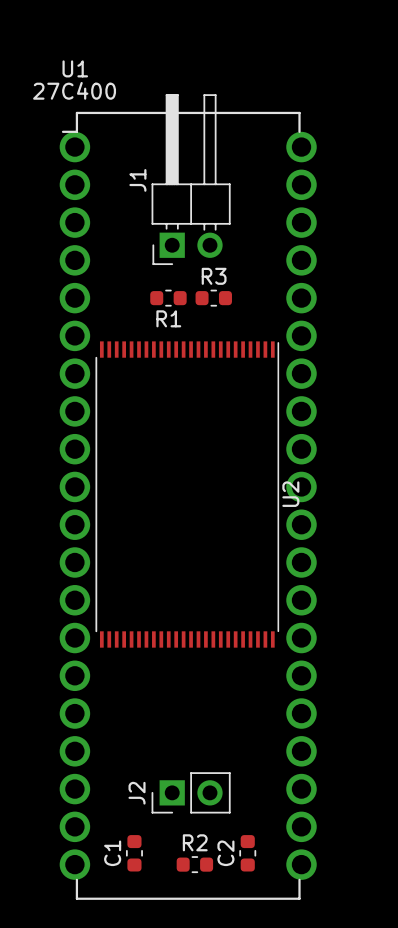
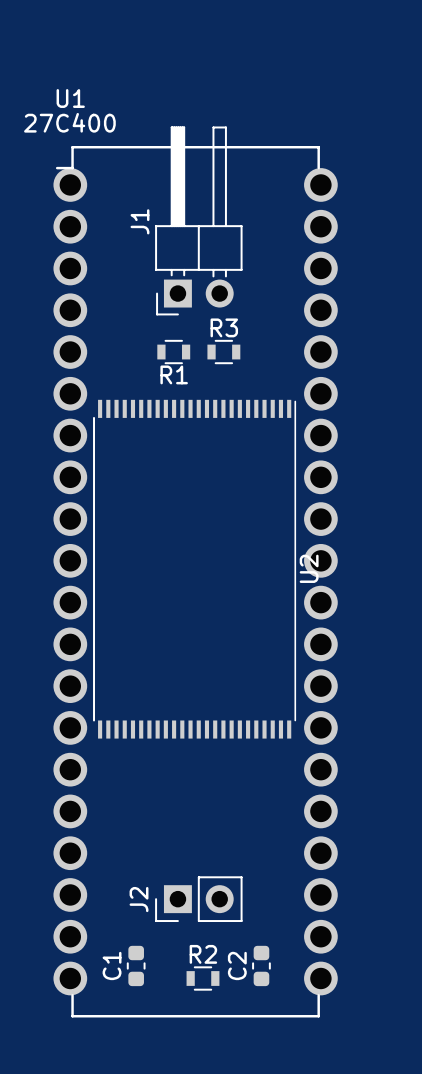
R1 footprint: [150, 289, 187, 307] -> [157, 339, 191, 365]
R3 footprint: [195, 289, 232, 307] -> [207, 339, 241, 365]
R2 footprint: [176, 856, 214, 874] -> [186, 966, 220, 991]

